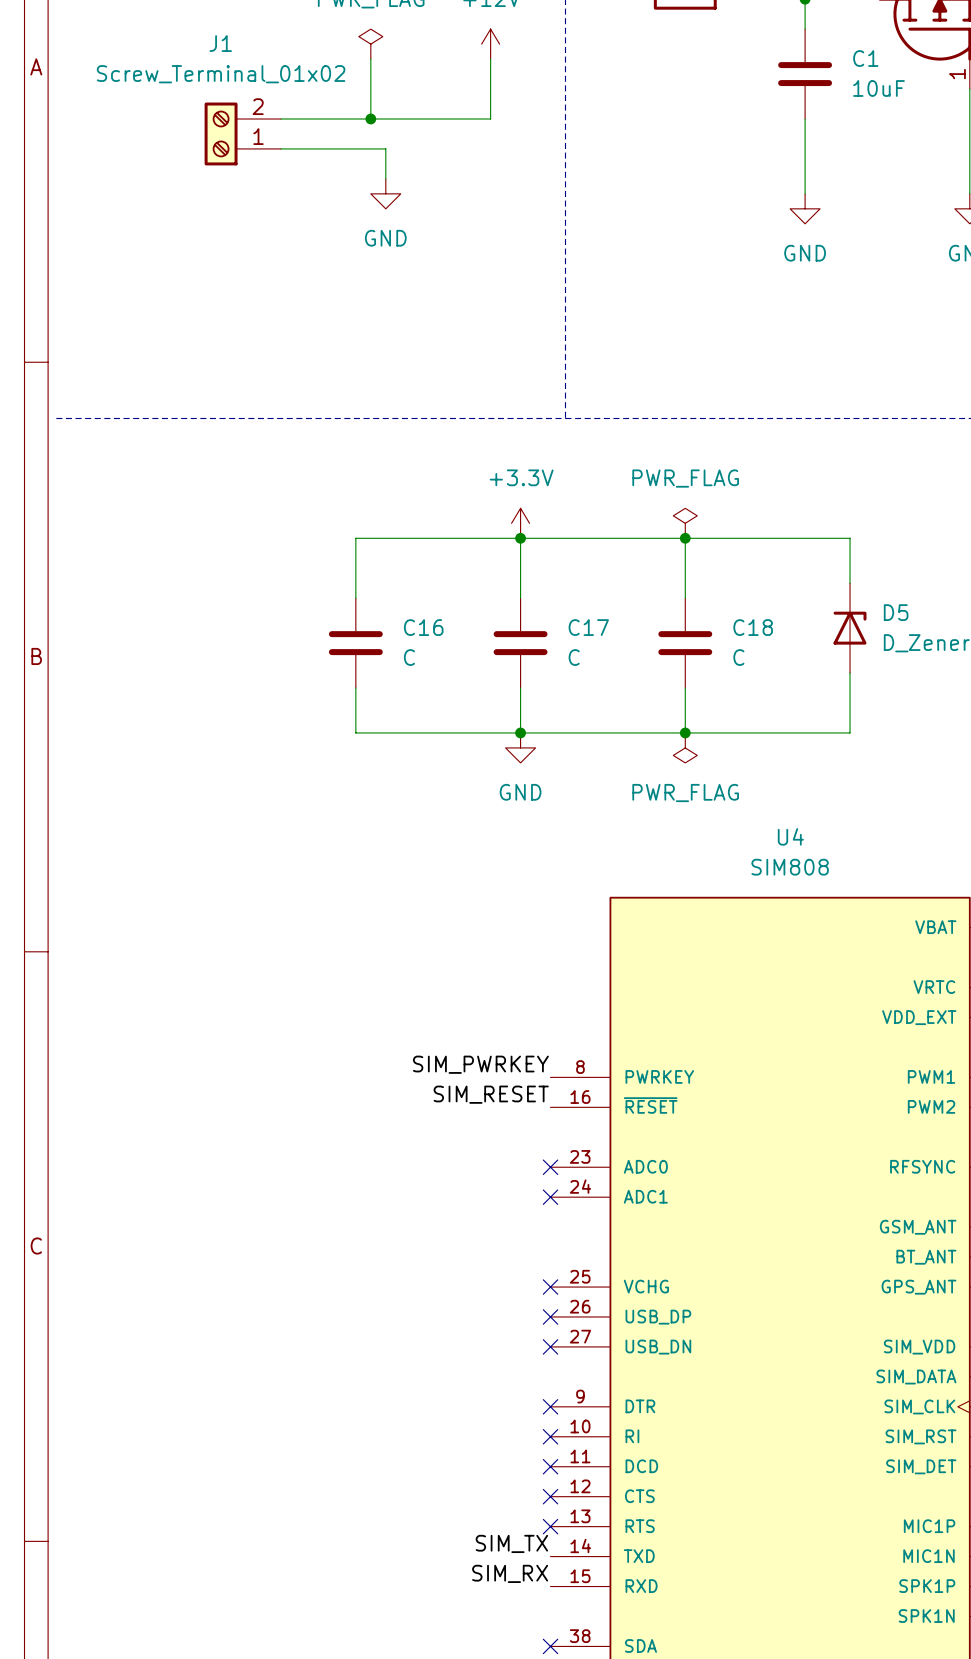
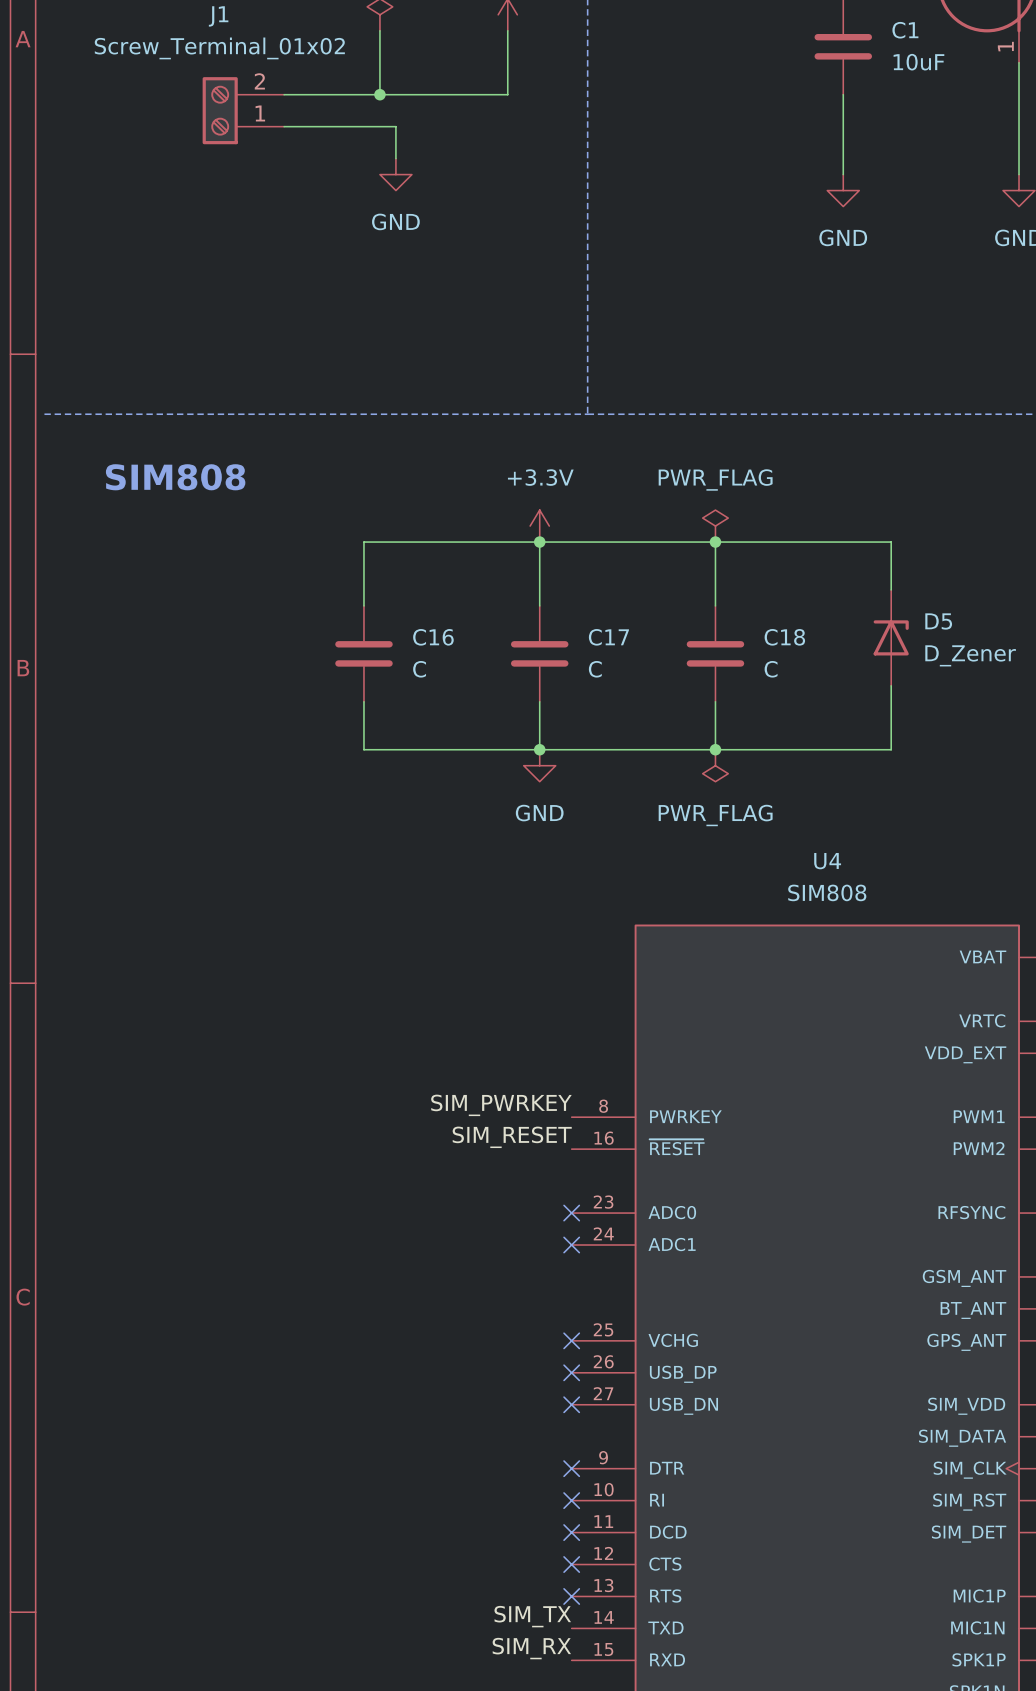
text: none -> SIM808 (175, 477)

